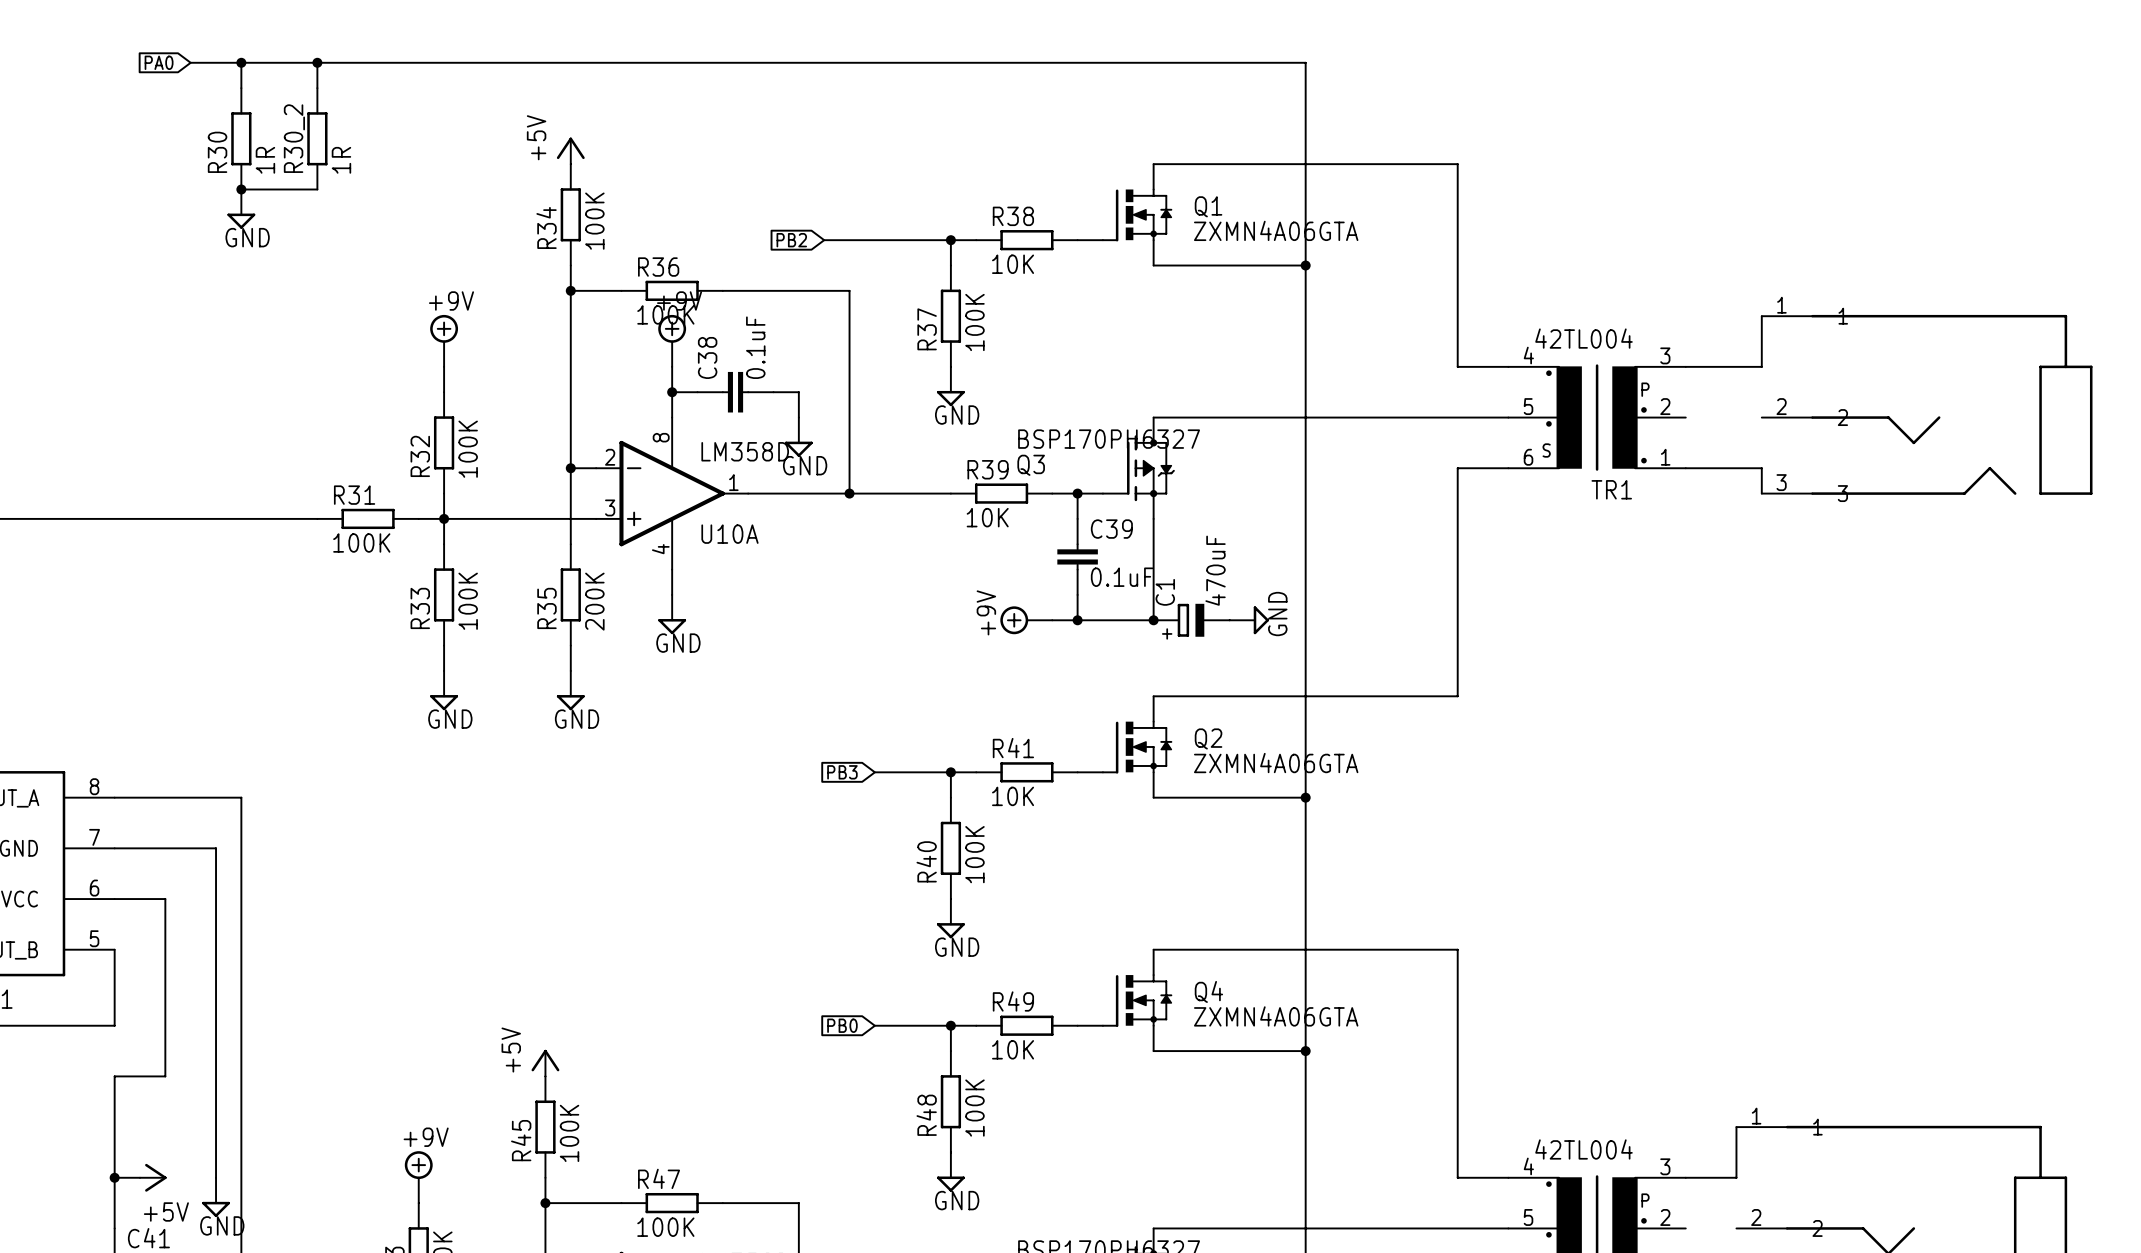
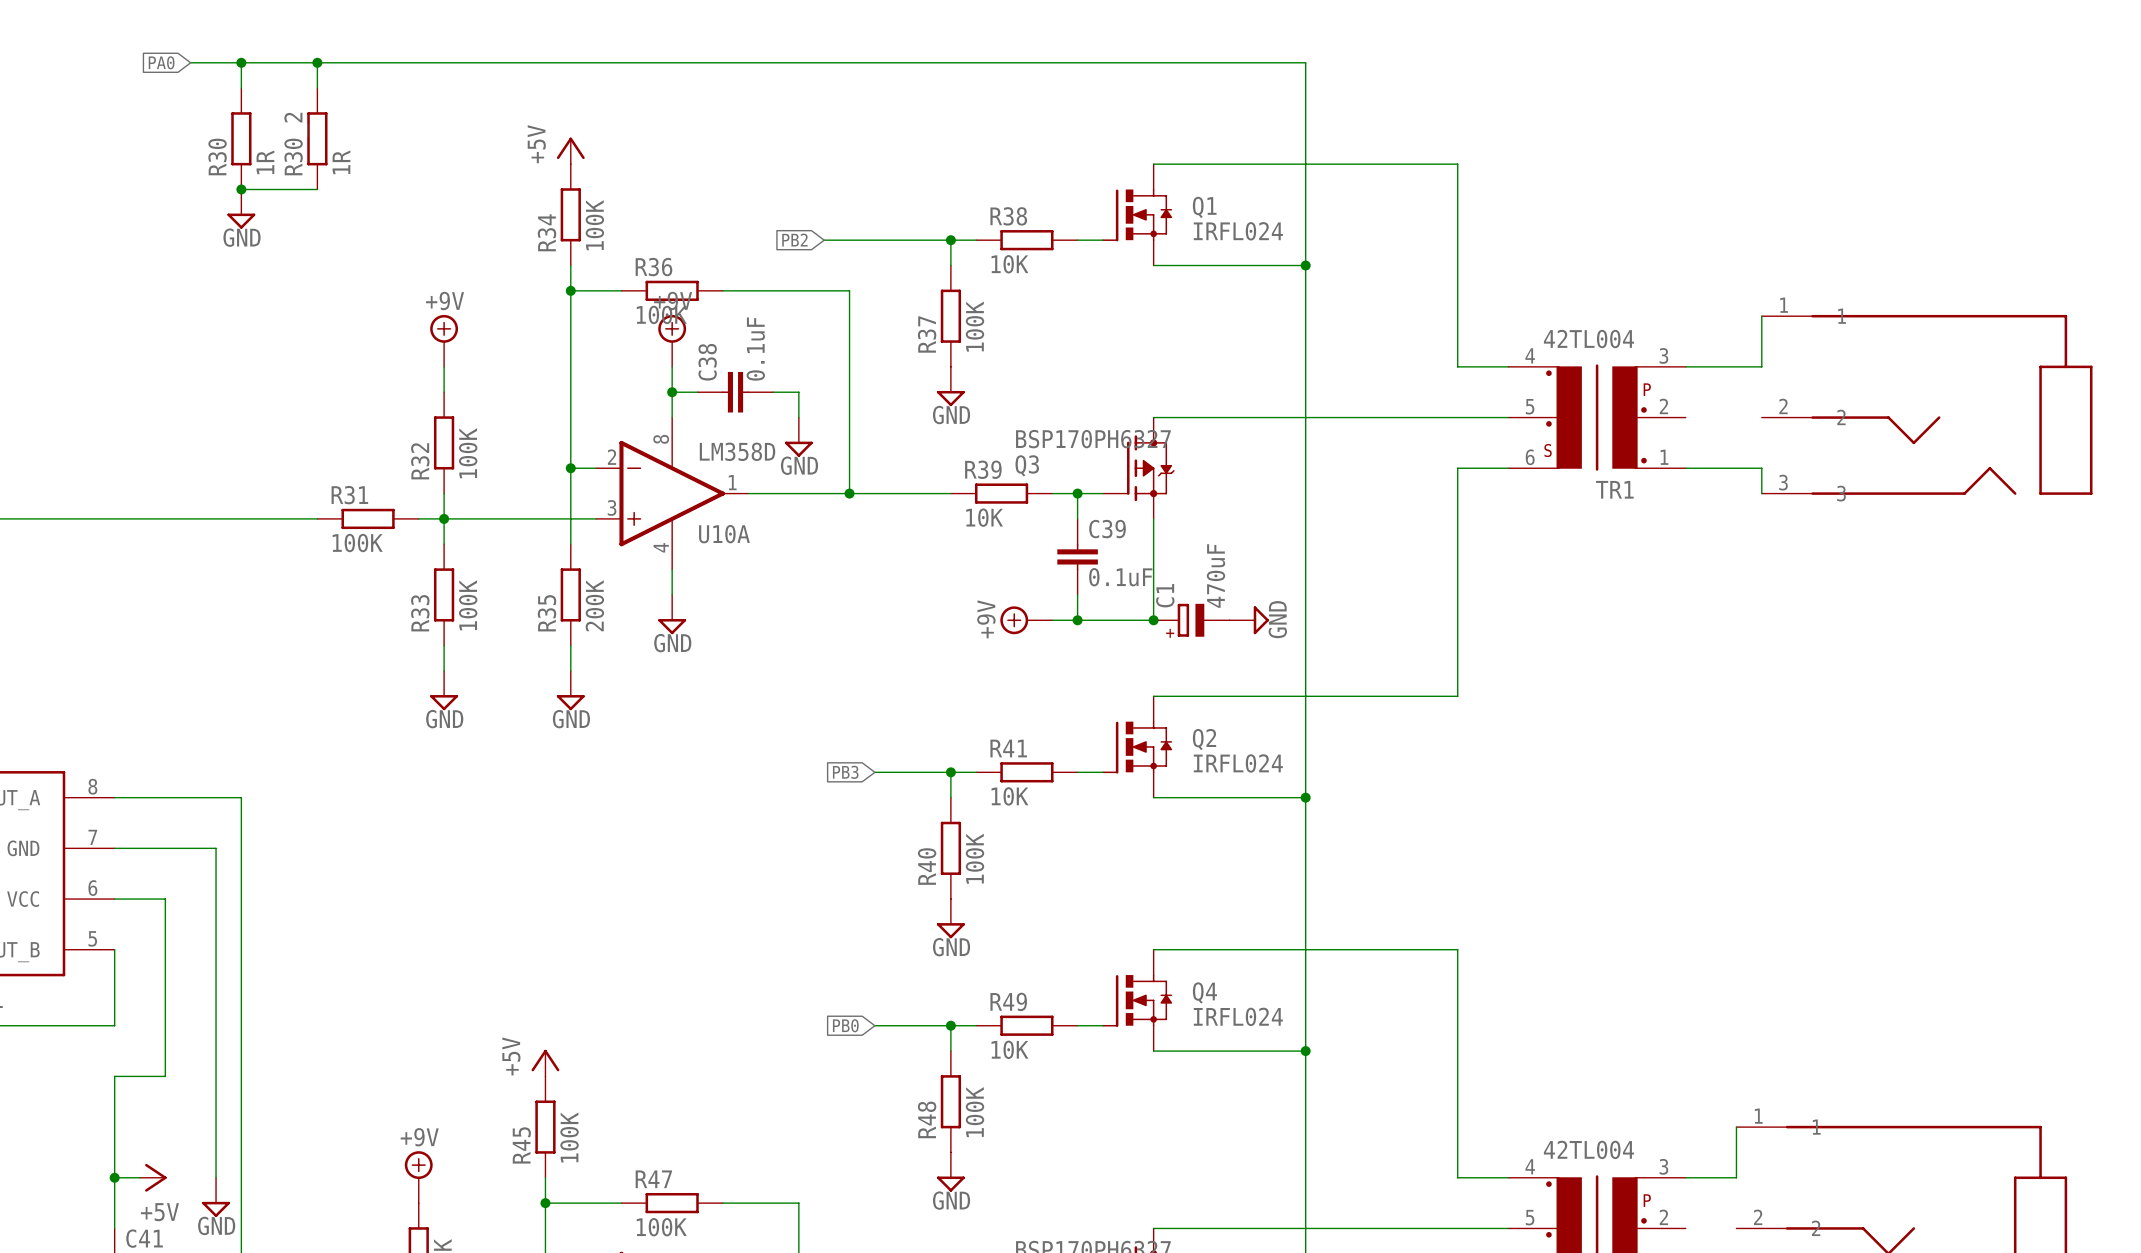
Q1 value: ZXMN4A06GTA (1276, 230) -> IRFL024 (1238, 231)
Q2 value: ZXMN4A06GTA (1276, 763) -> IRFL024 (1238, 763)
Q4 value: ZXMN4A06GTA (1276, 1016) -> IRFL024 (1238, 1016)

